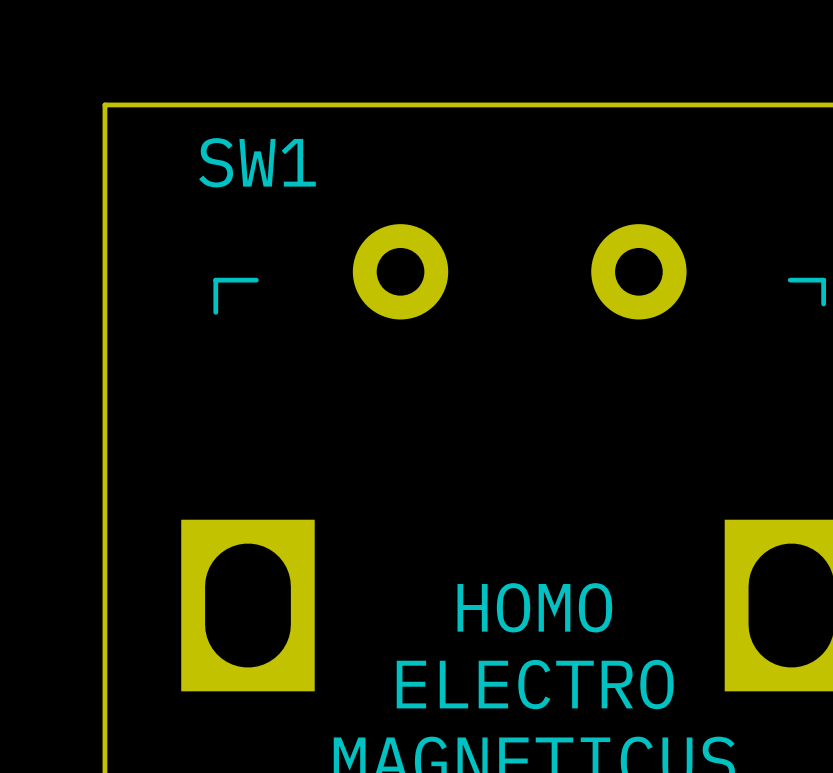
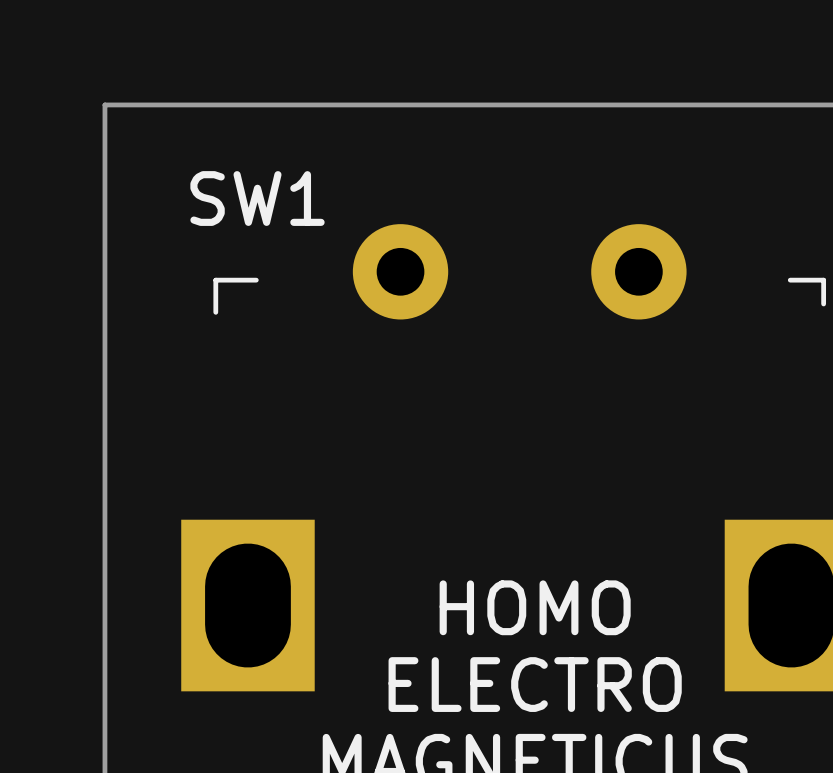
SW1 name position: SW1 (257, 162) -> SW1 (257, 198)

